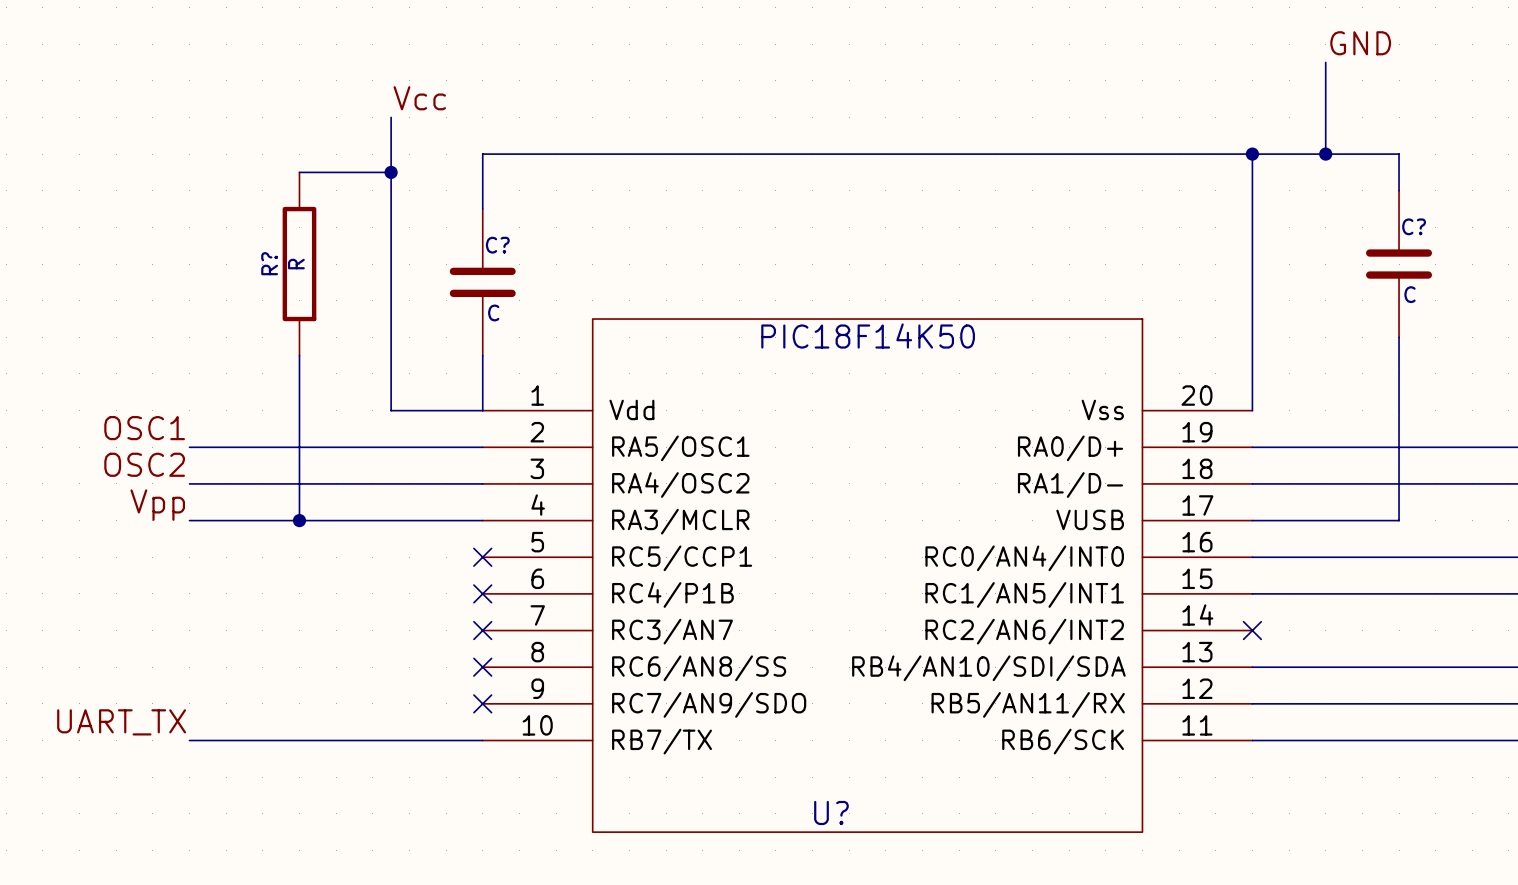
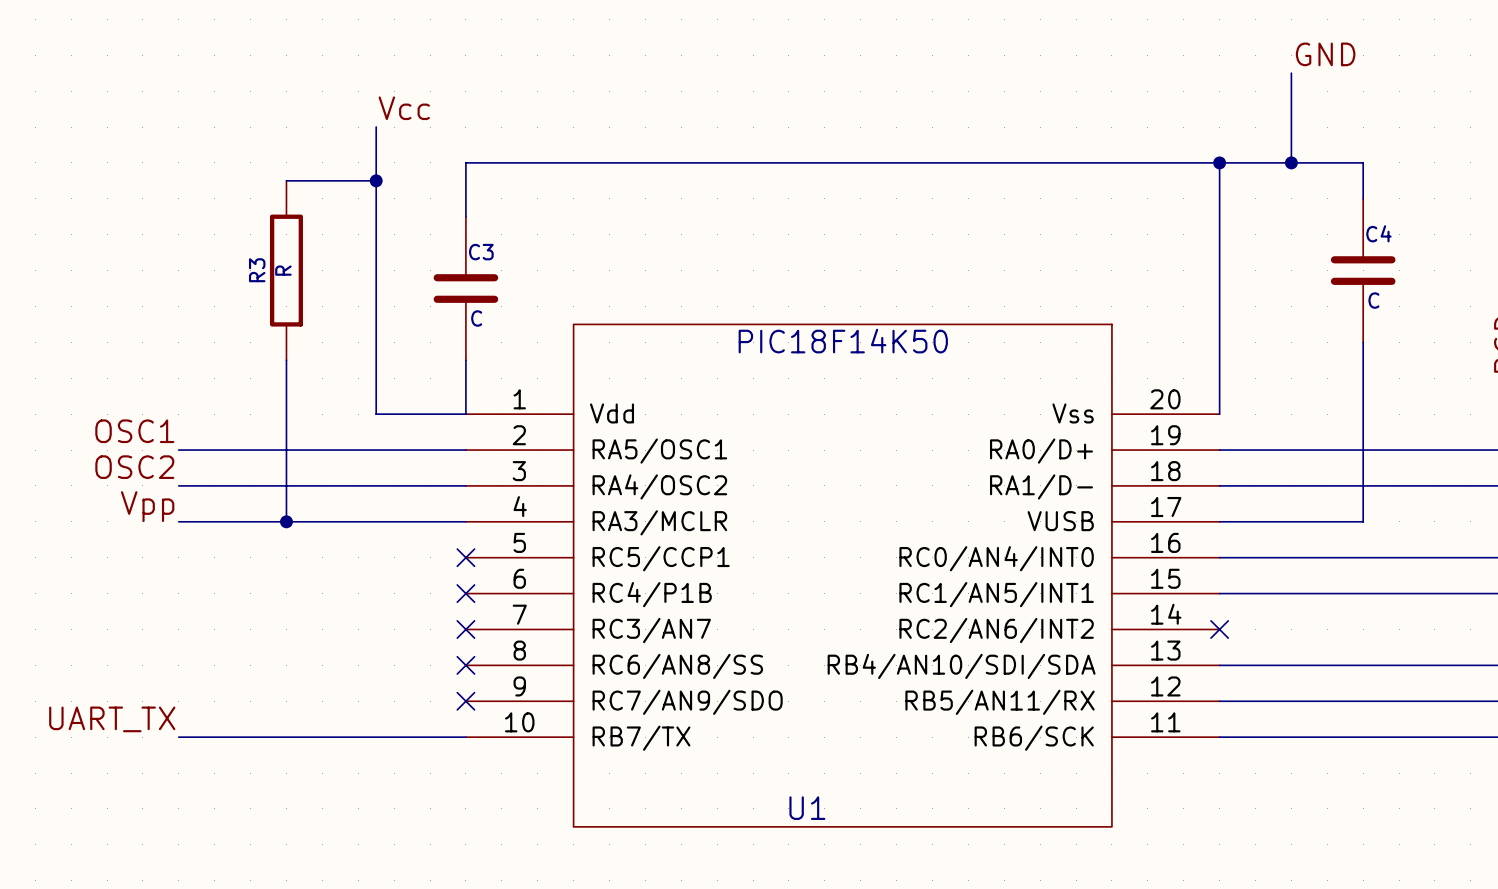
C? name: C? (1414, 226) -> C4 (1378, 233)
C? name: C? (497, 245) -> C3 (481, 252)
R? name: R? (269, 263) -> R3 (257, 270)
U? name: U? (831, 812) -> U1 (807, 808)

